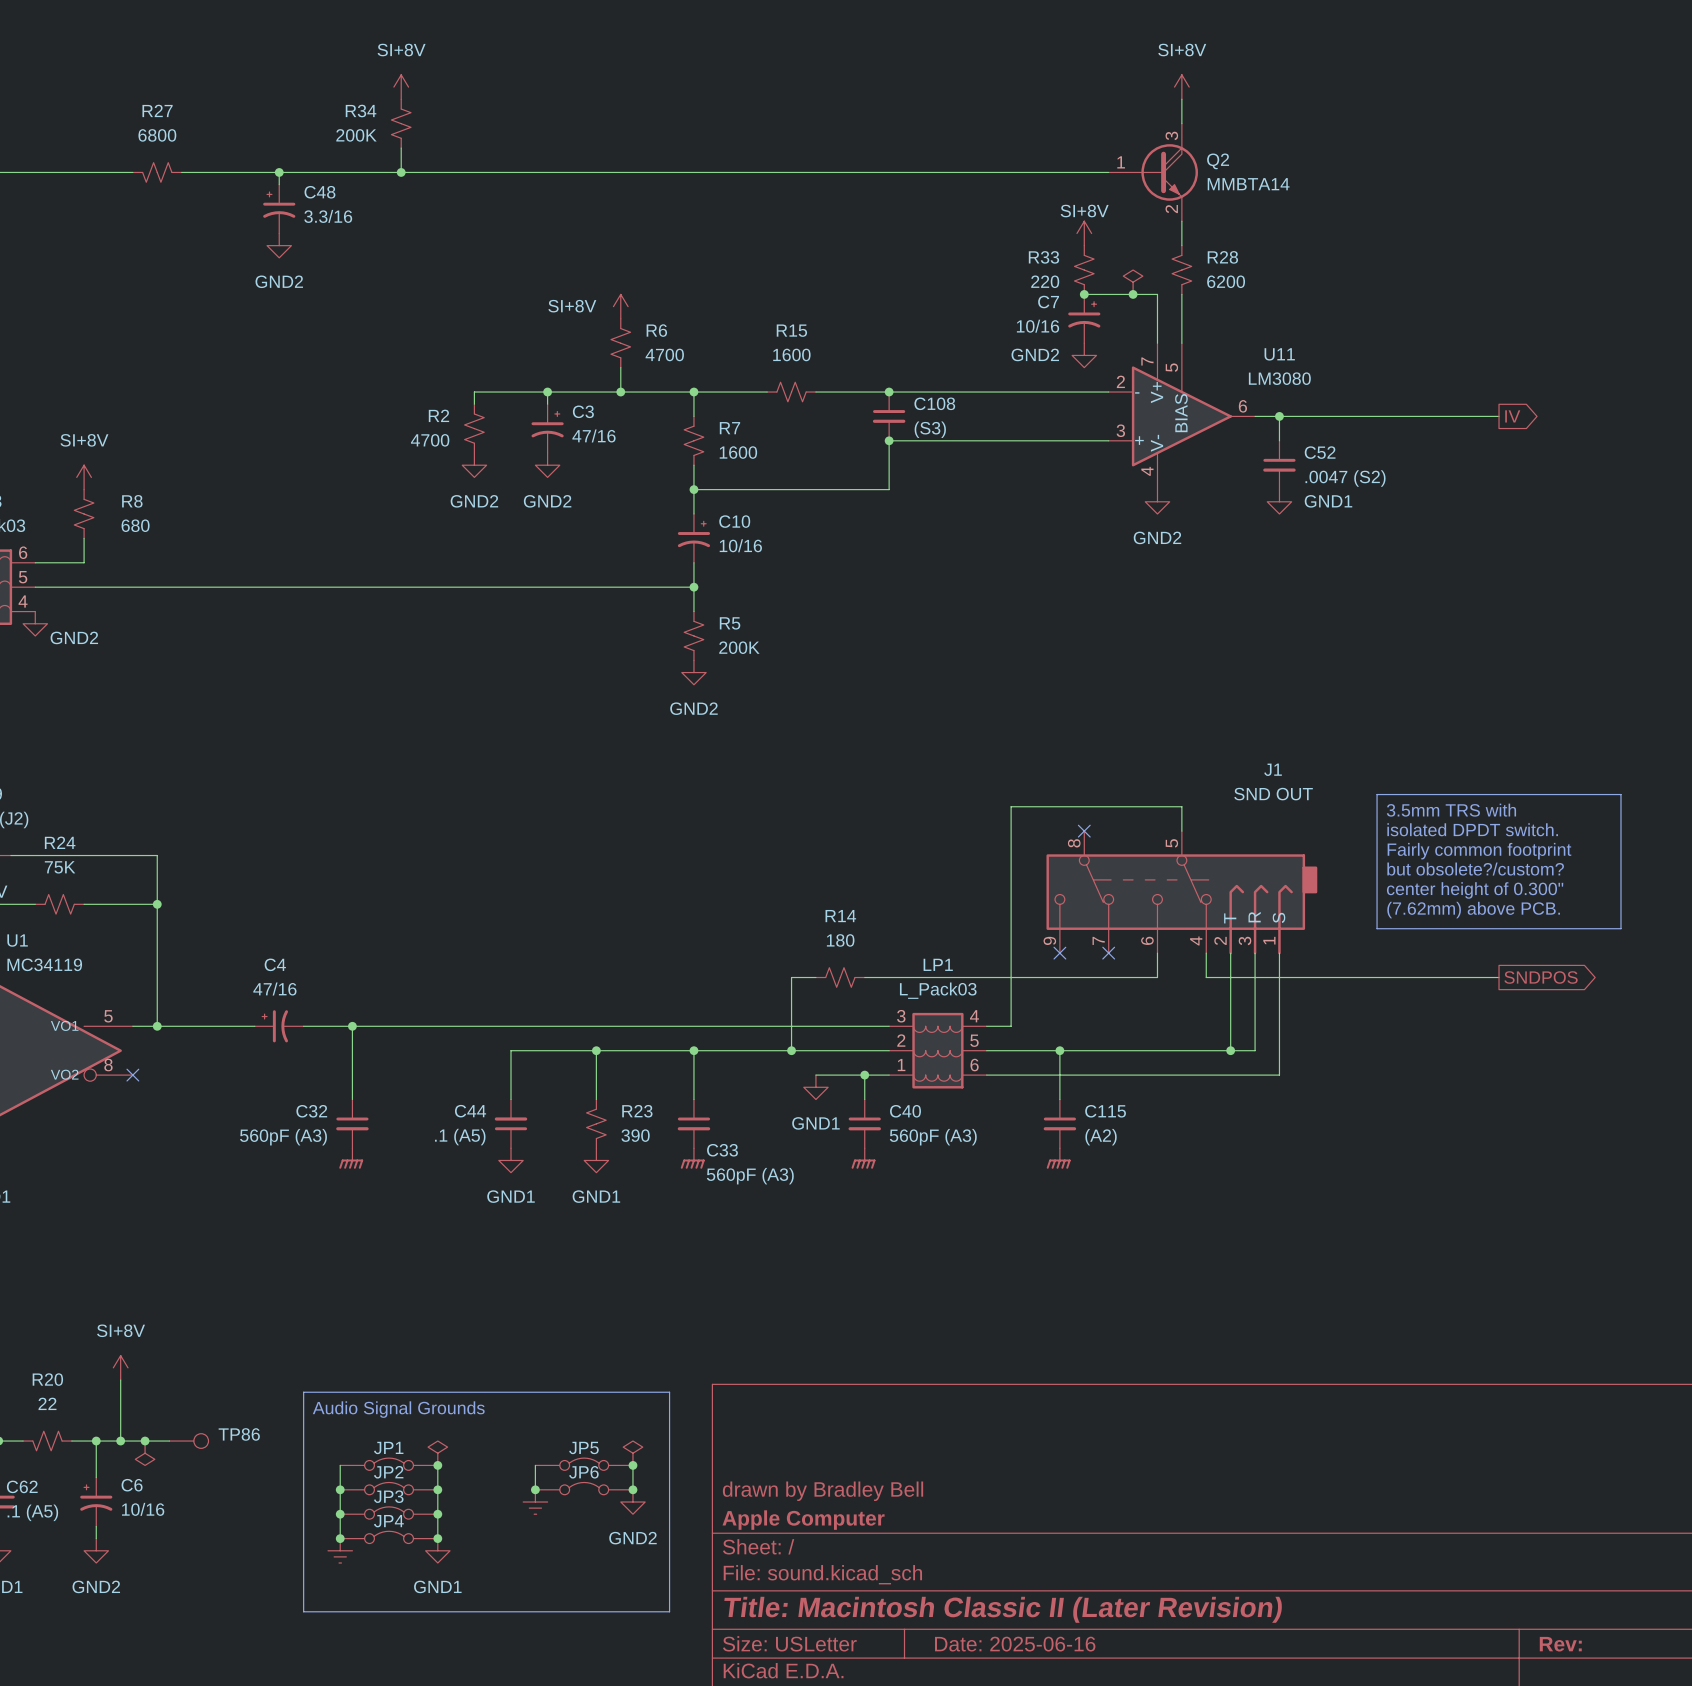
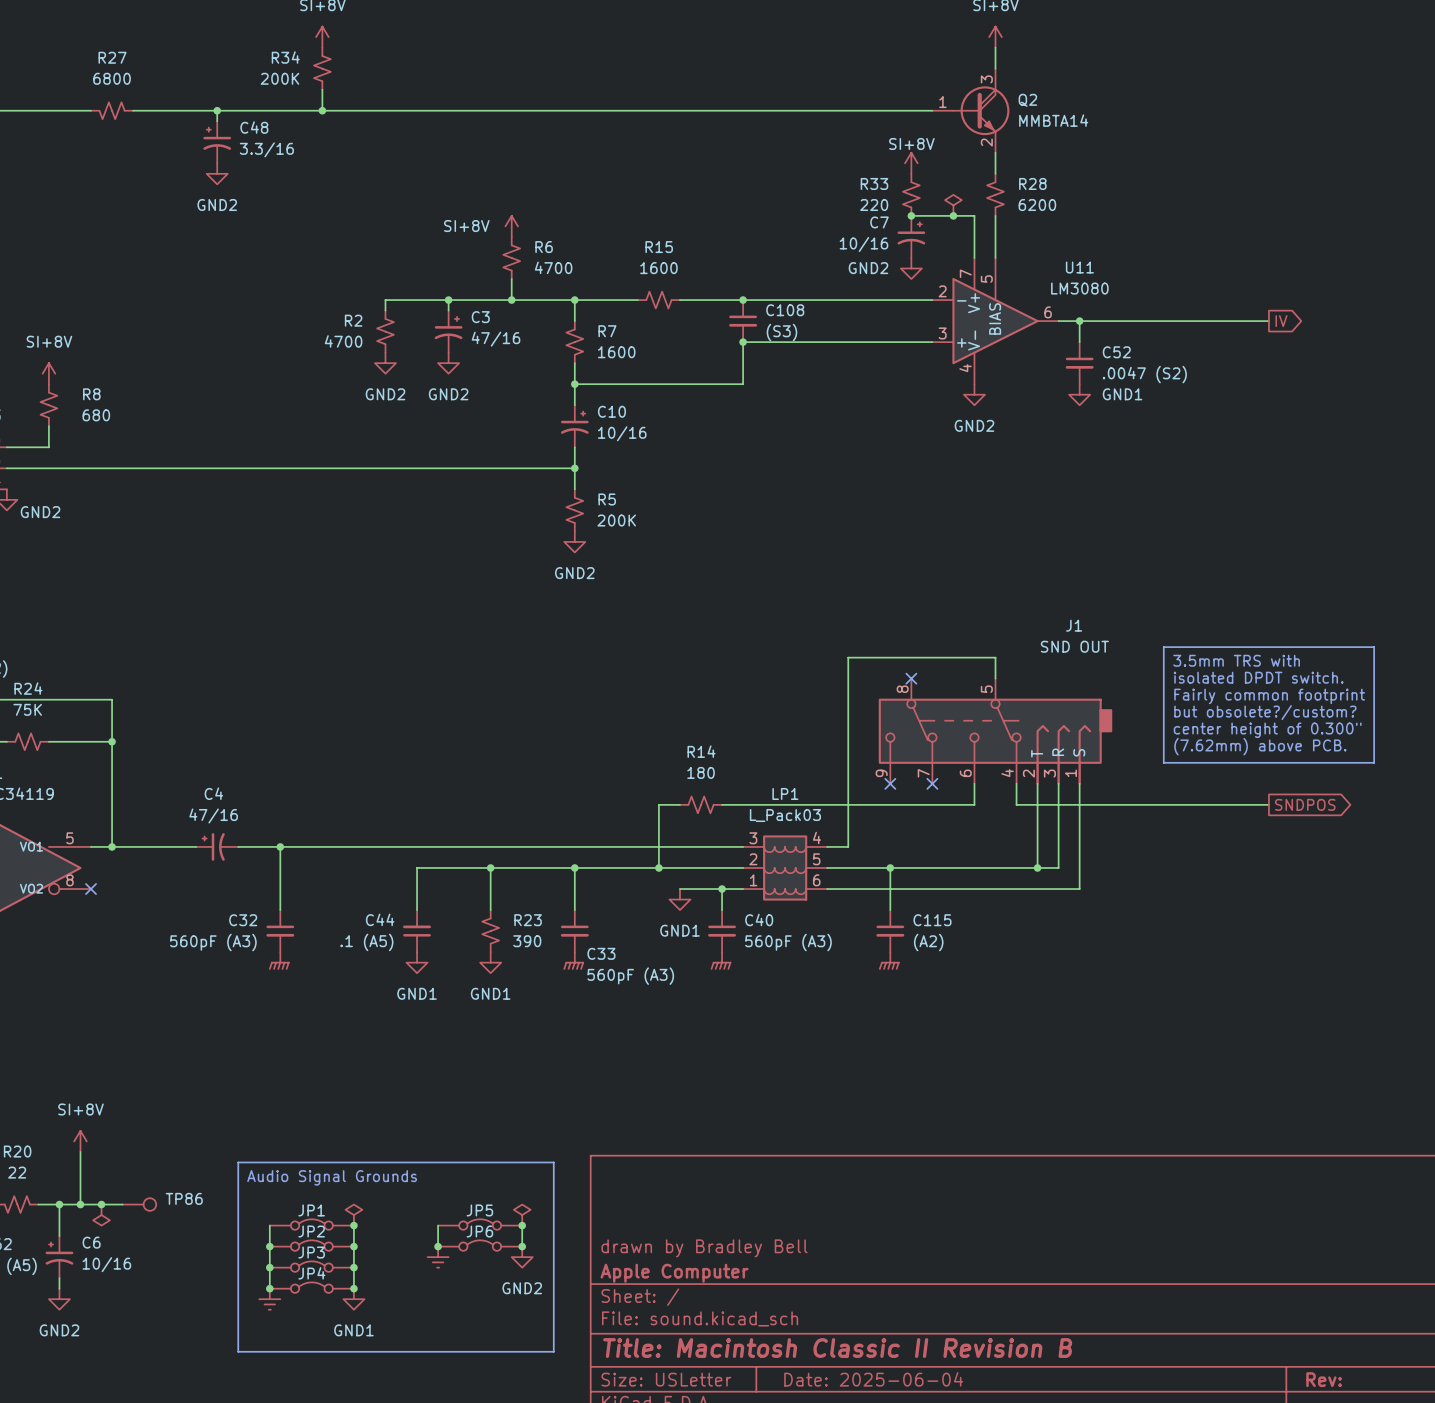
title block: Title: Macintosh Classic II (Later Revision) (1003, 1609) -> Title: Macintosh Classic II Revision B (837, 1348)
title block: Date: 2025-06-16 (1015, 1644) -> Date: 2025-06-04 (873, 1379)

